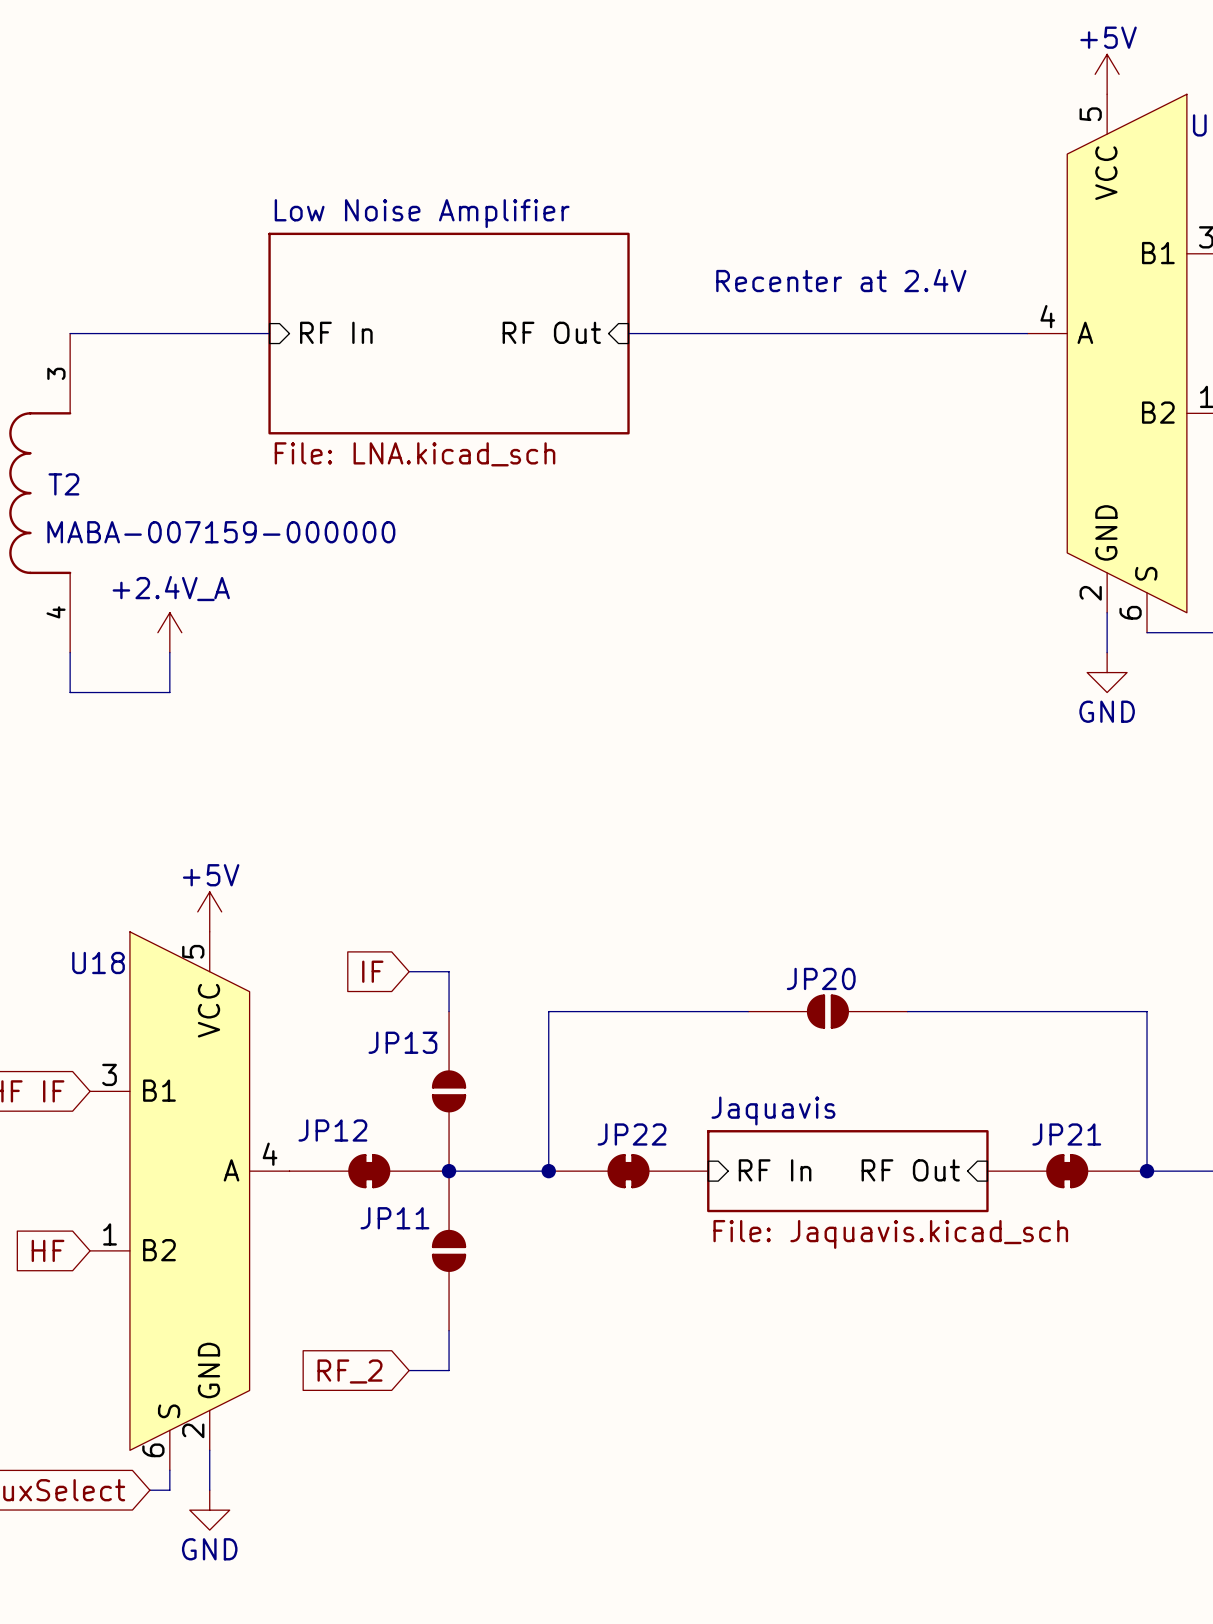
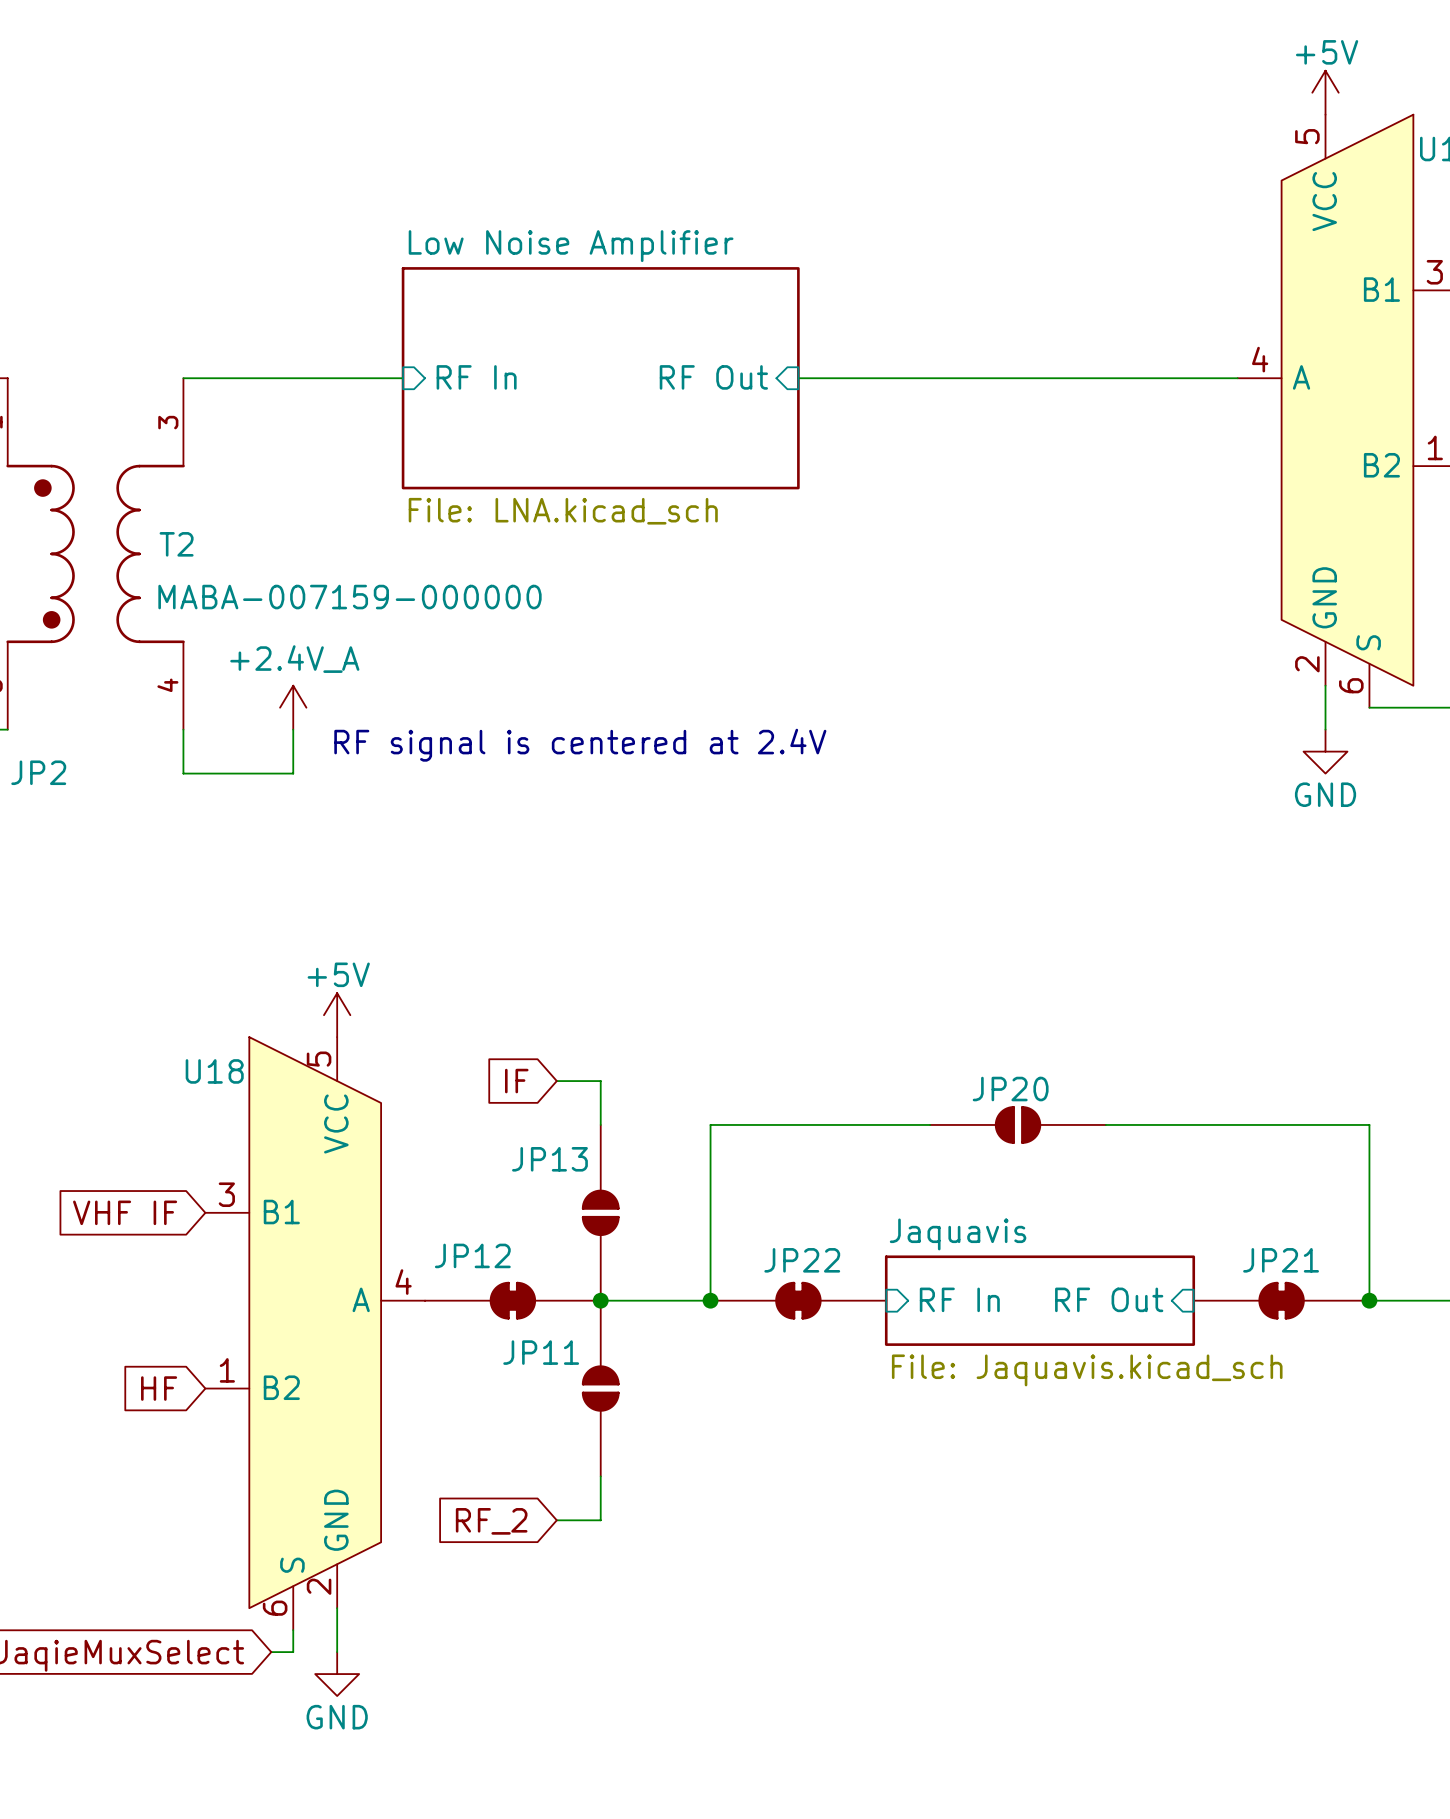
text: Recenter at 2.4V (841, 280) -> none
text: none -> RF signal is centered at 2.4V (580, 745)

